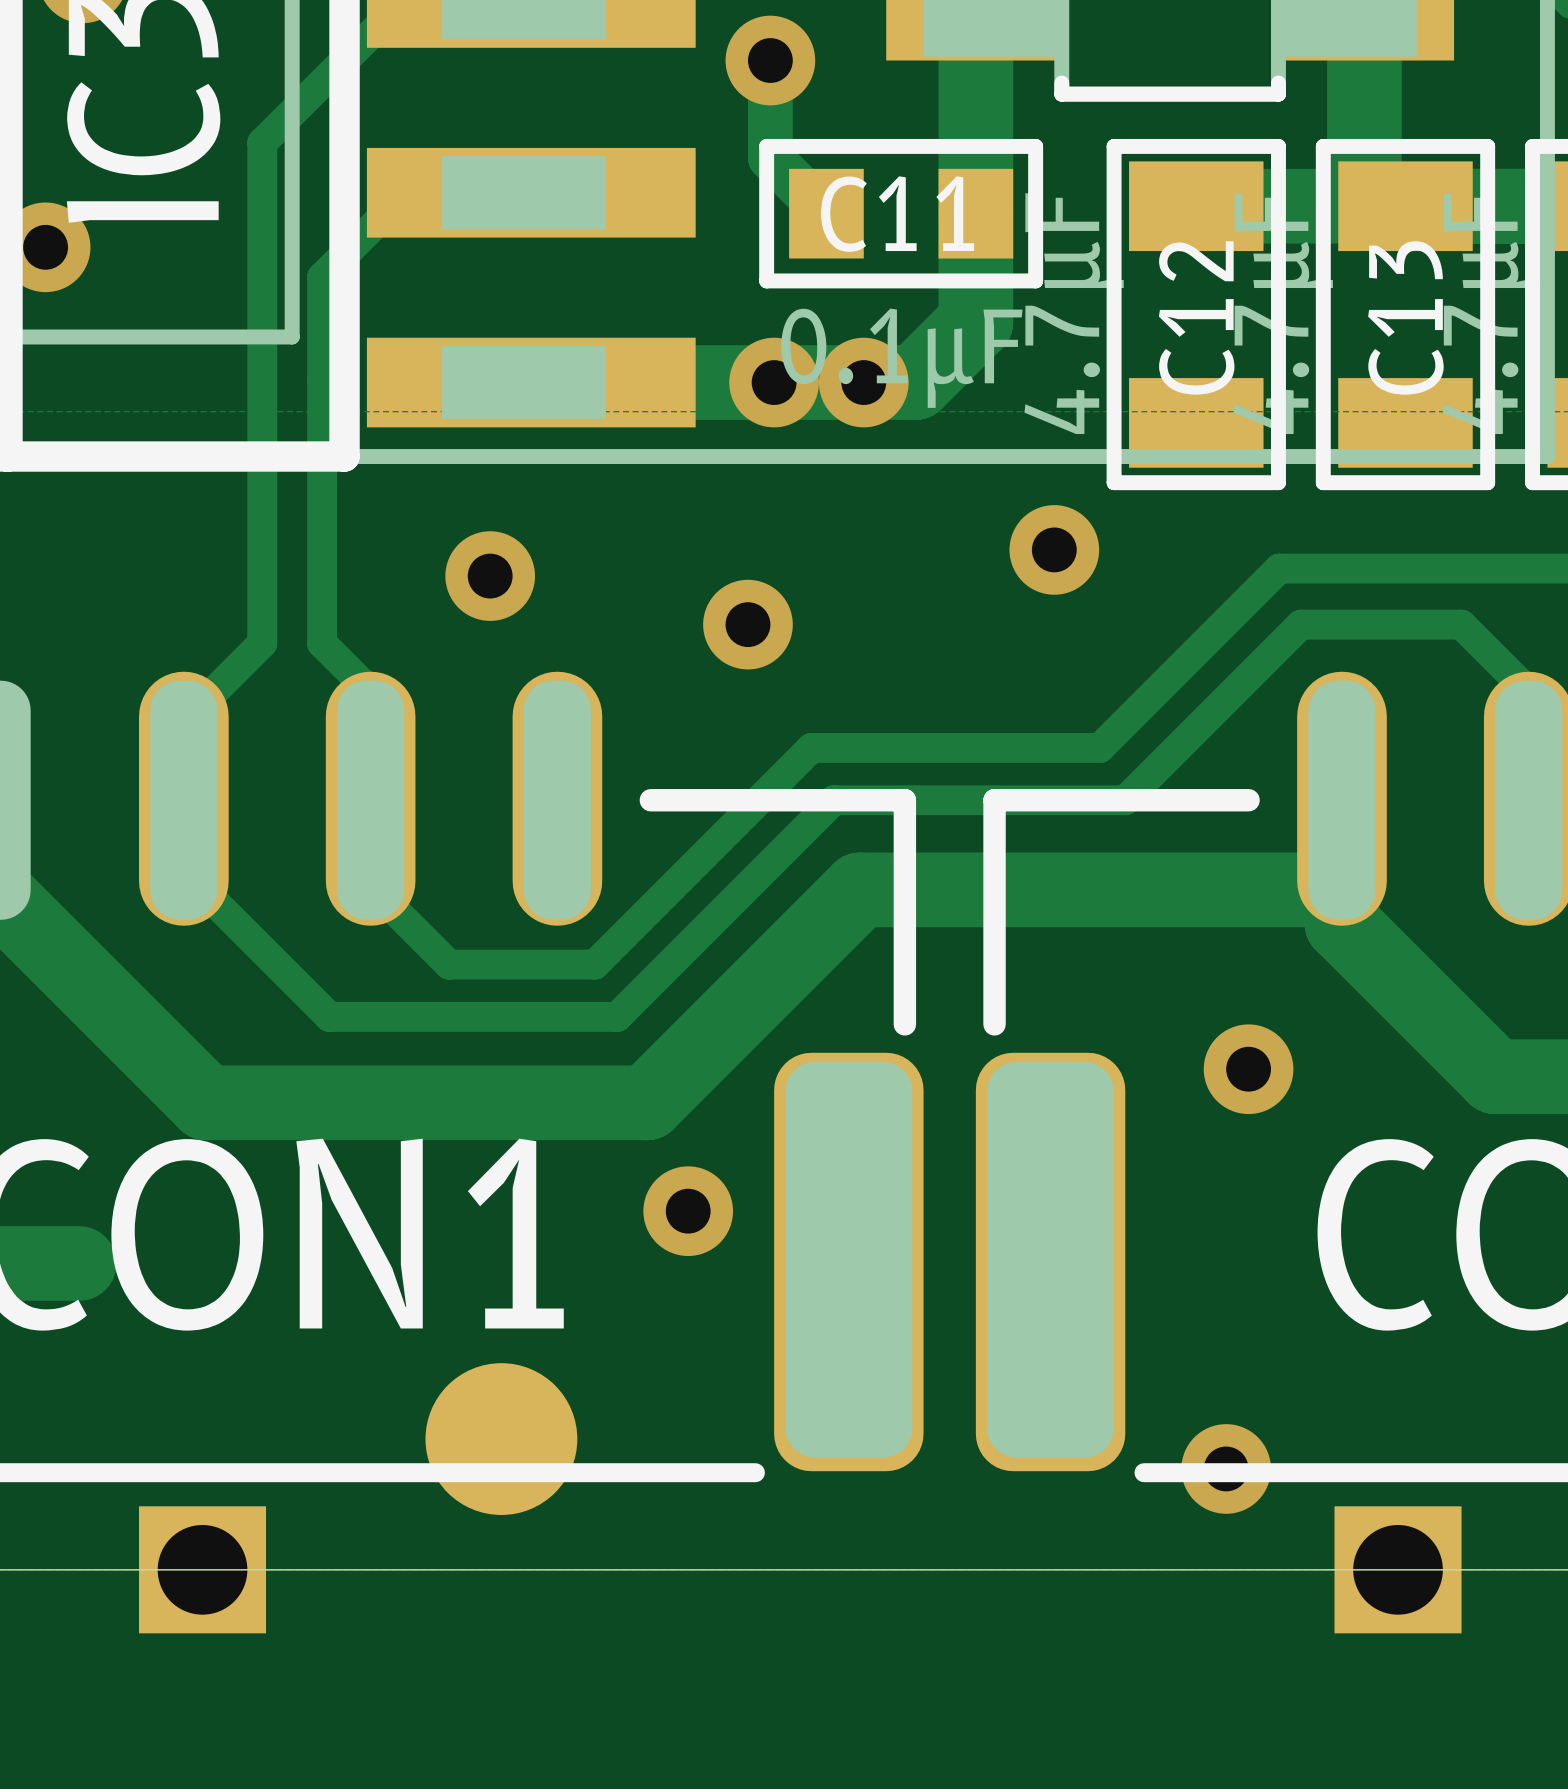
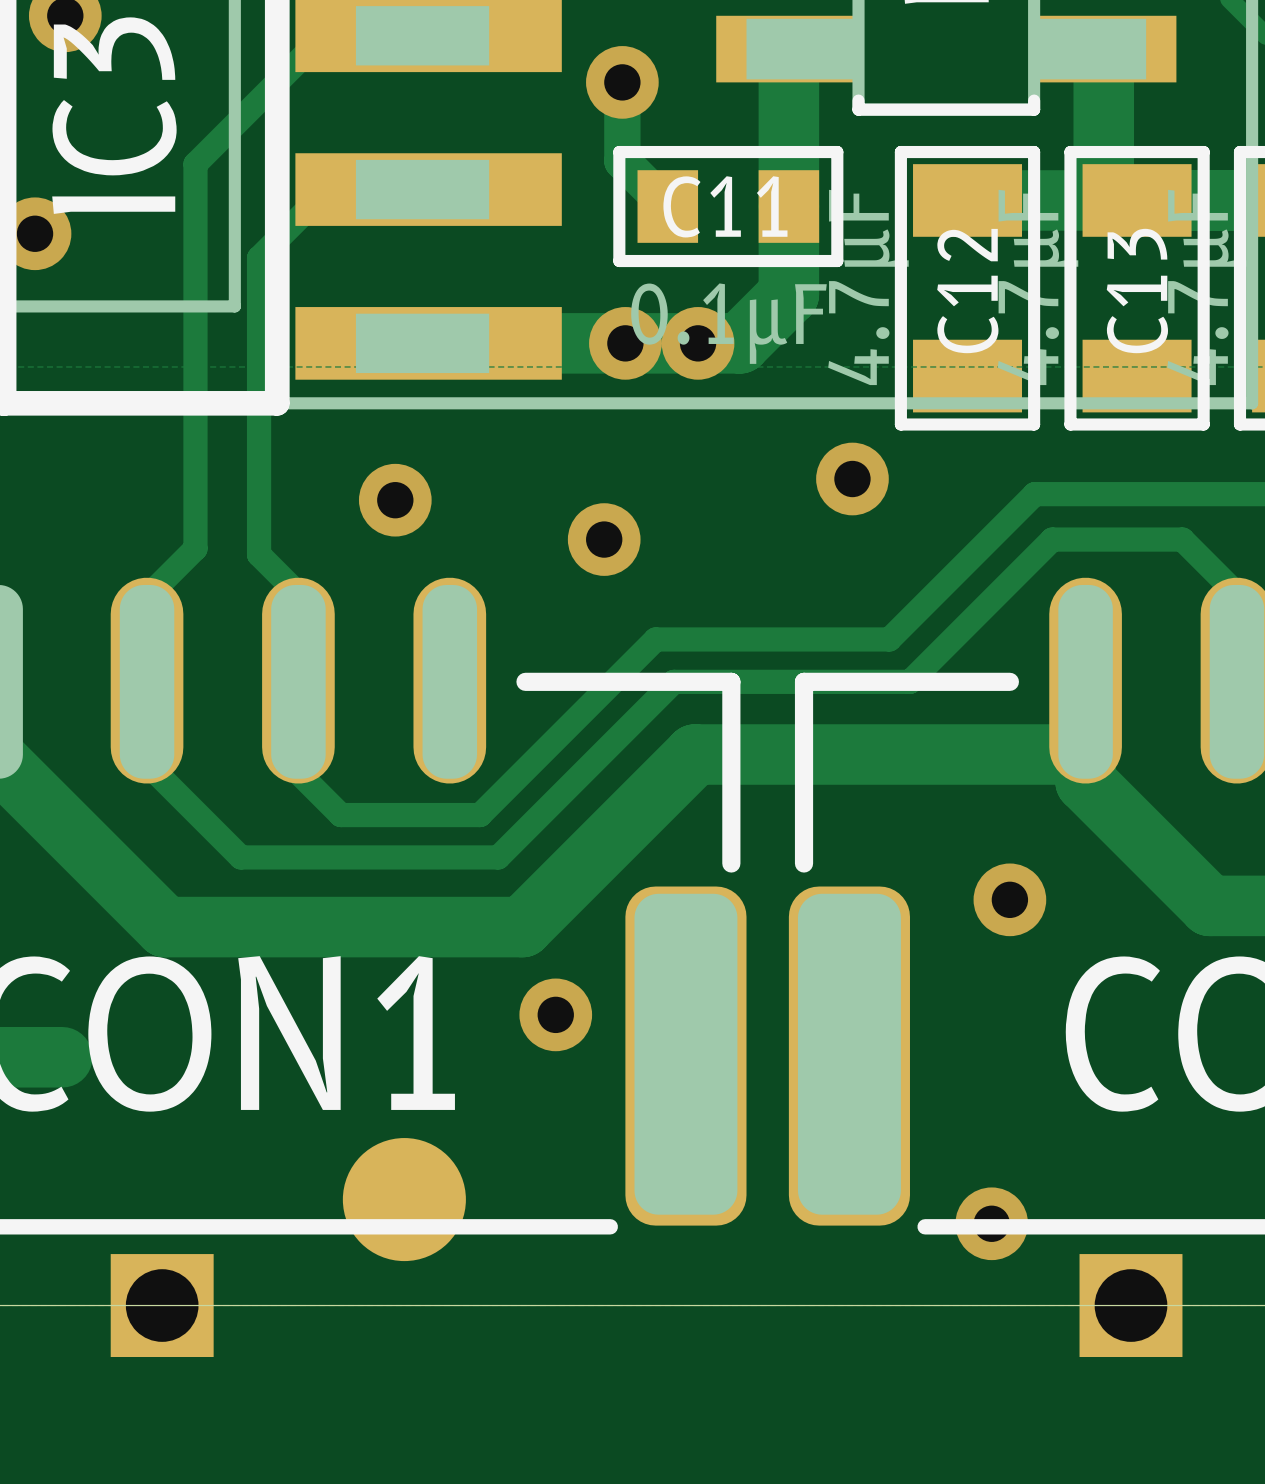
track: (262, 142) (262, 643) (183, 721) -> (210, 149) (195, 164) (195, 548) (147, 597) (147, 618)
track: (183, 871) (329, 1016) -> (147, 739) (147, 763) (240, 857) (265, 857)
track: (370, 886) (449, 964) -> (298, 751) (298, 772) (340, 815) (362, 815)

